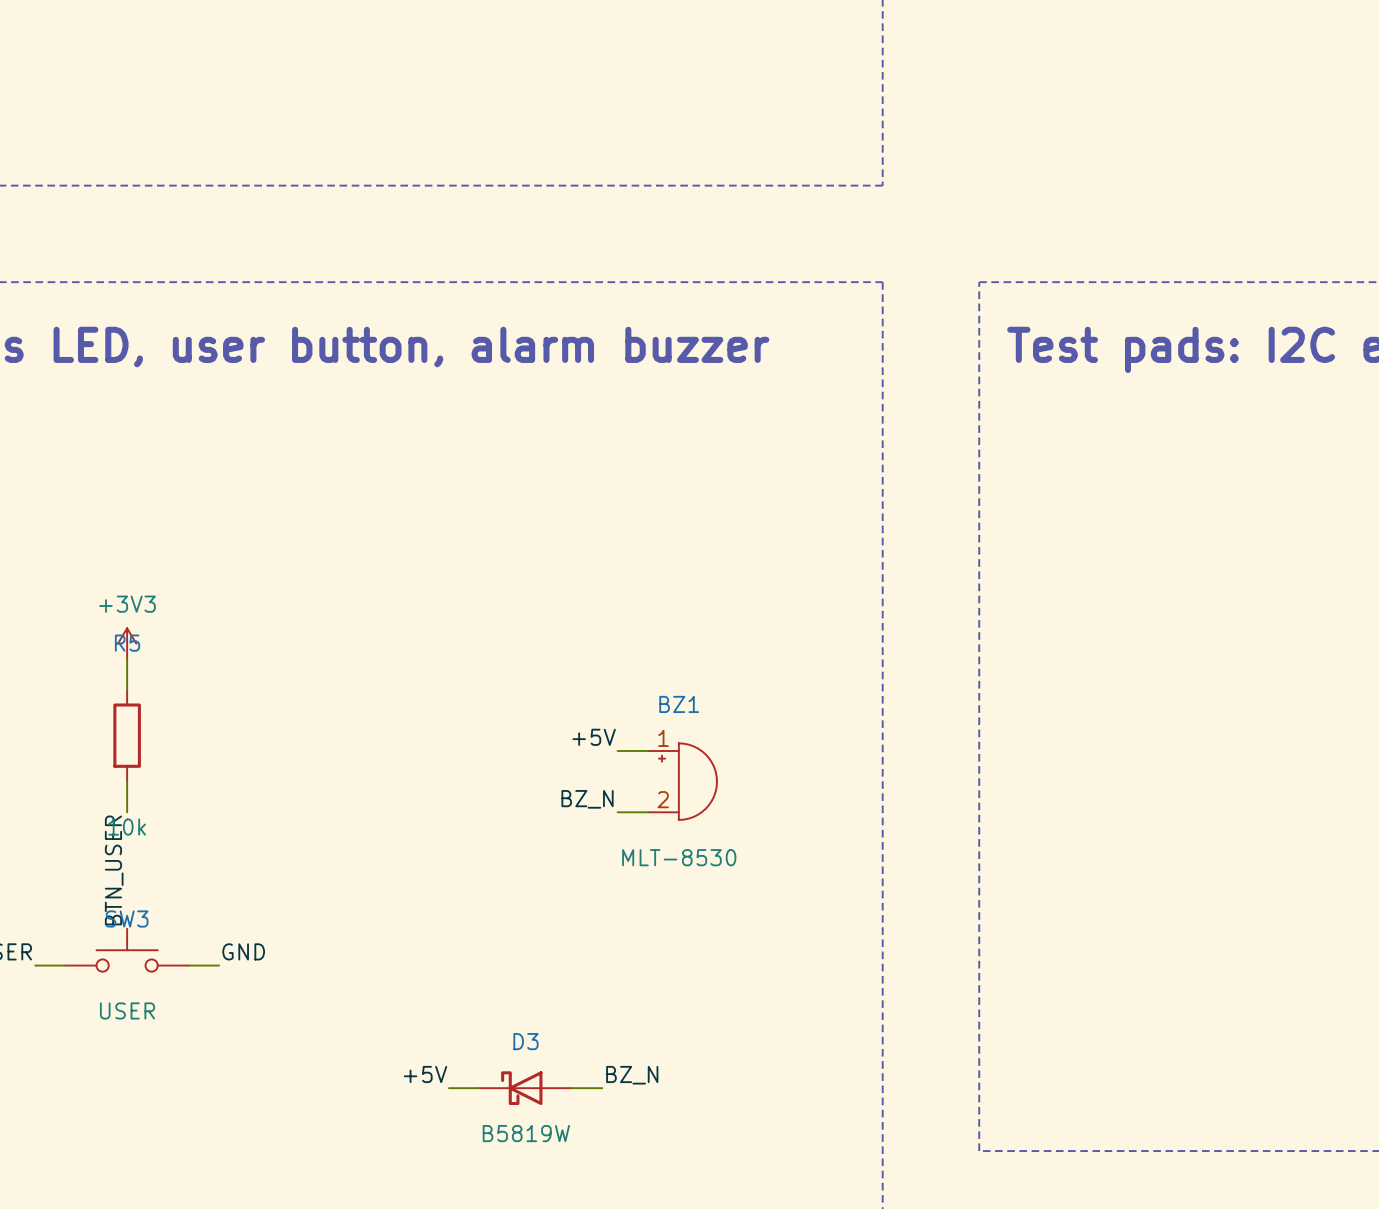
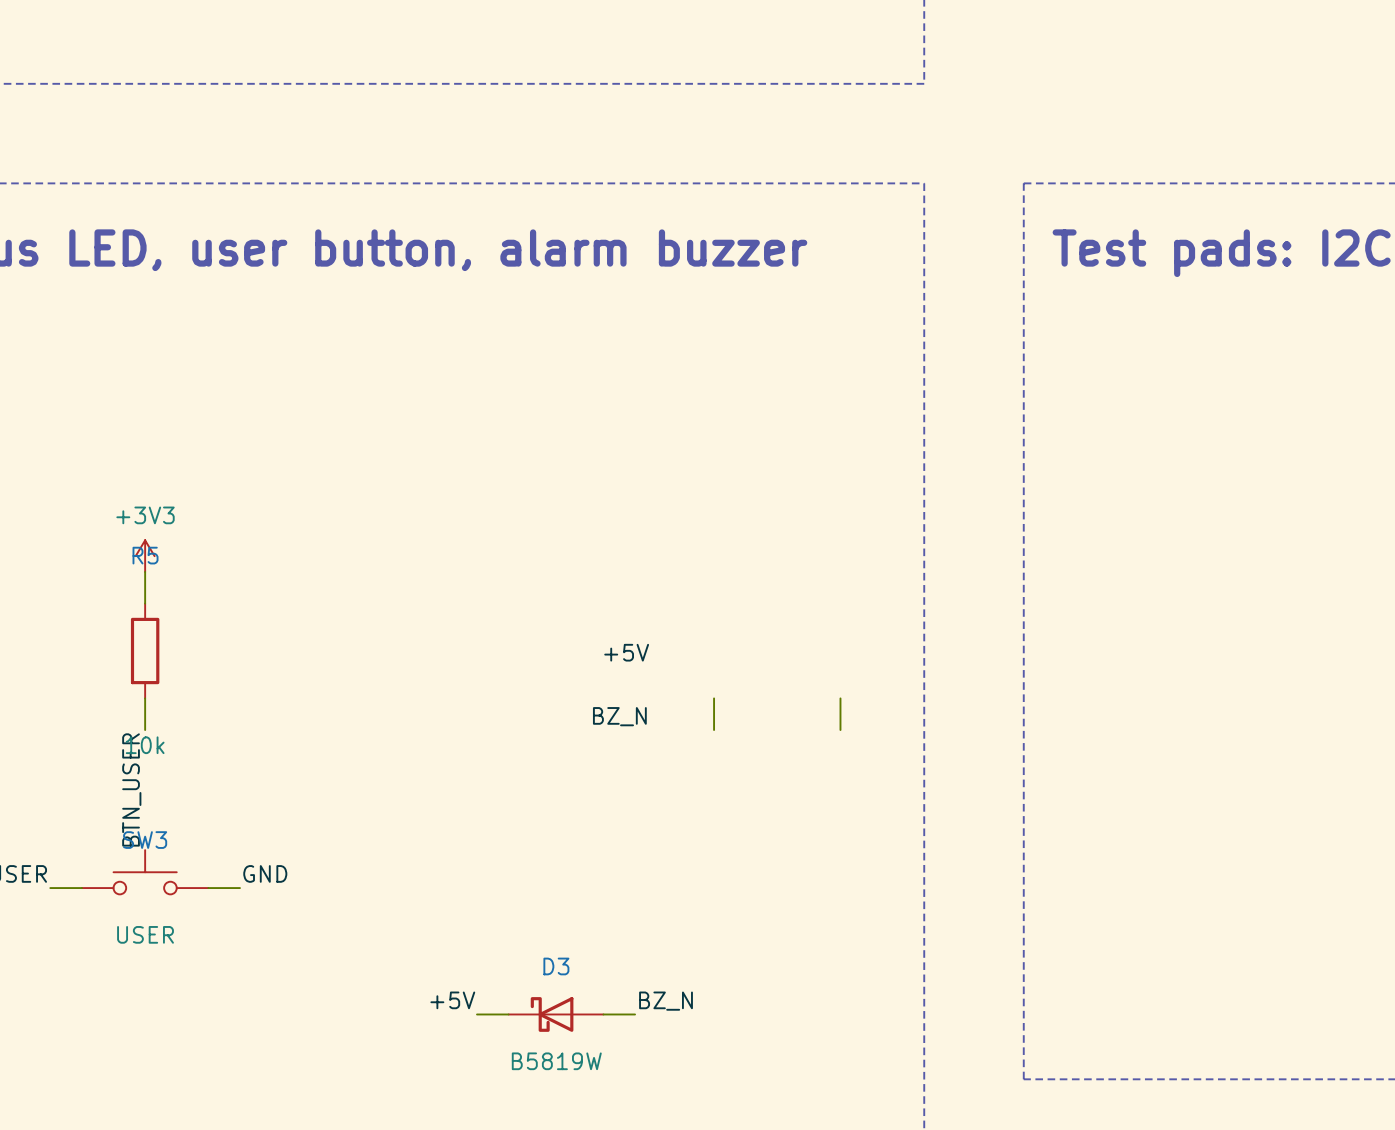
wire: (617, 750) (648, 750) -> none
BZ1: MLT-8530 (682, 781) -> none
wire: none -> (840, 698) (840, 730)
wire: (617, 812) (648, 812) -> none

